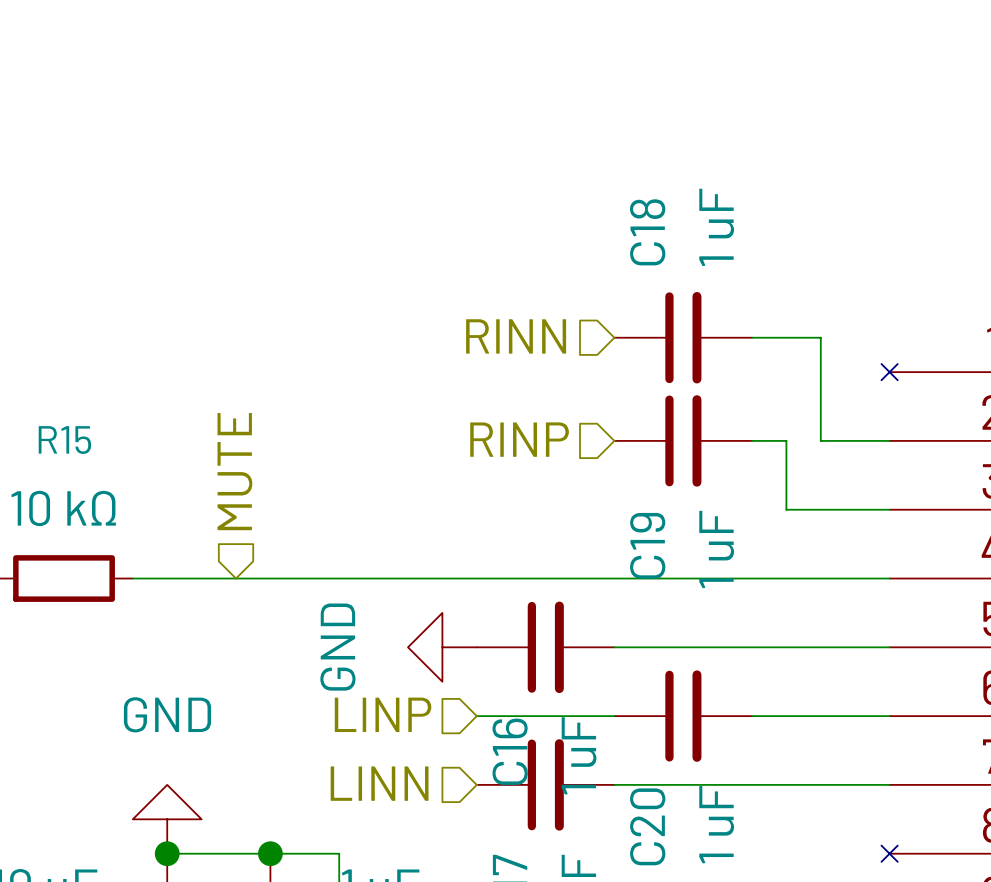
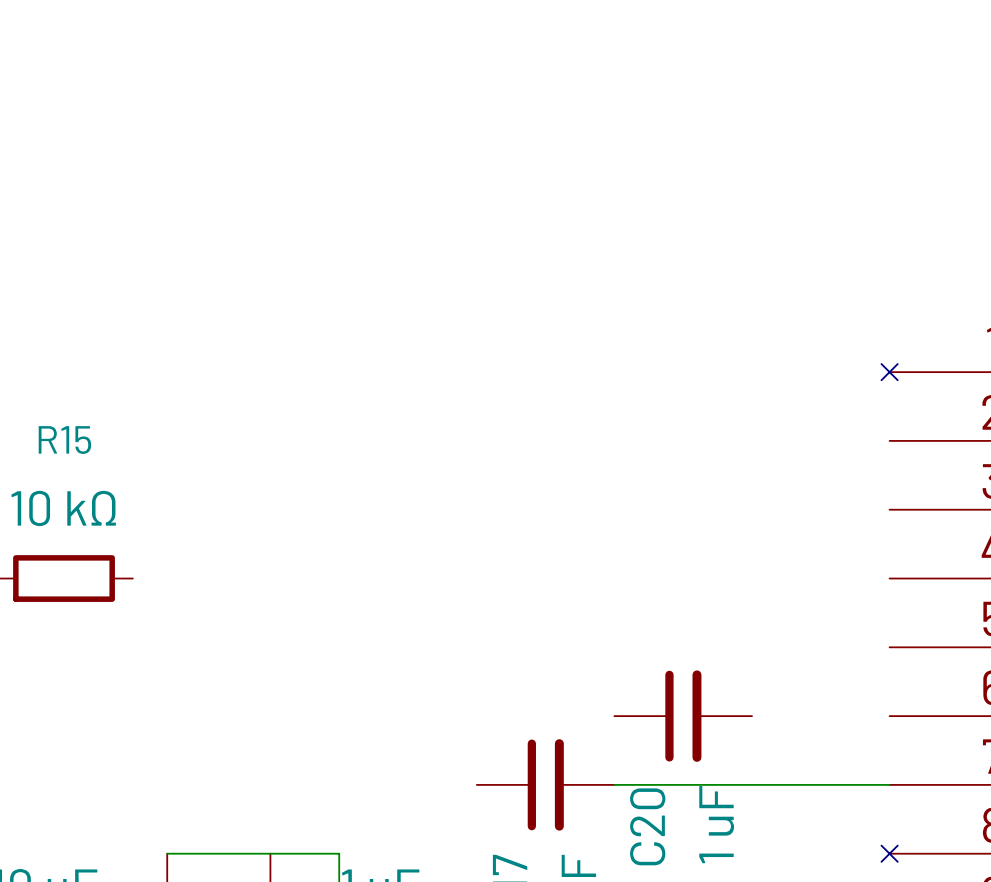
hierarchical label: RINN (516, 336) -> none
C18: 1 uF (683, 337) -> none
wire: (752, 337) (820, 337) (820, 440) (889, 440) -> none
hierarchical label: RINP (519, 439) -> none
C19: 1 uF (683, 440) -> none
wire: (752, 440) (786, 440) (786, 509) (889, 509) -> none
hierarchical label: MUTE (234, 471) -> none
wire: (132, 578) (889, 578) -> none
power symbol: GND (442, 647) -> none
C16: 1 uF (545, 647) -> none
wire: (614, 647) (889, 647) -> none
hierarchical label: LINP (383, 714) -> none
wire: (476, 716) (614, 716) -> none
wire: (752, 716) (889, 716) -> none
hierarchical label: LINN (379, 783) -> none
power symbol: GND (167, 819) -> none
junction: (167, 853) -> none
junction: (270, 853) -> none

